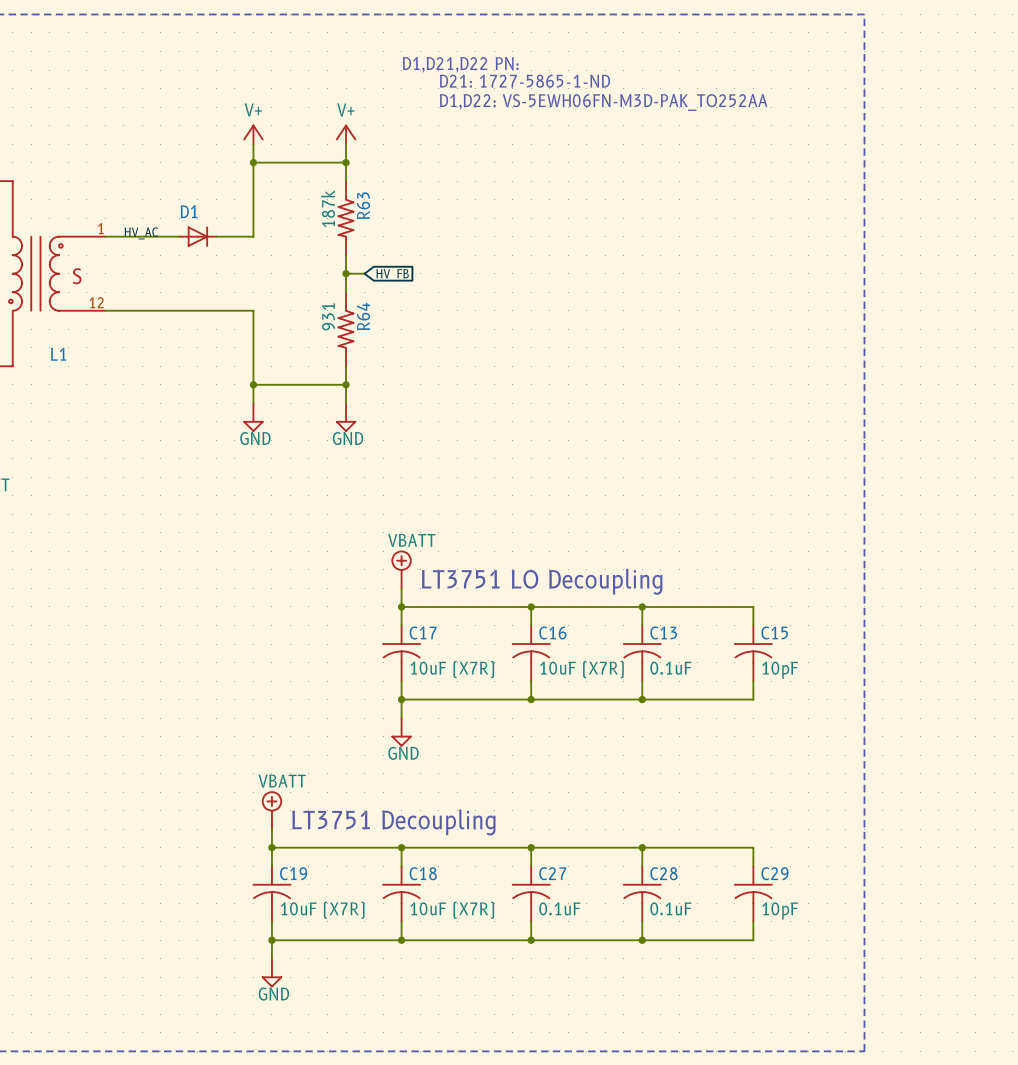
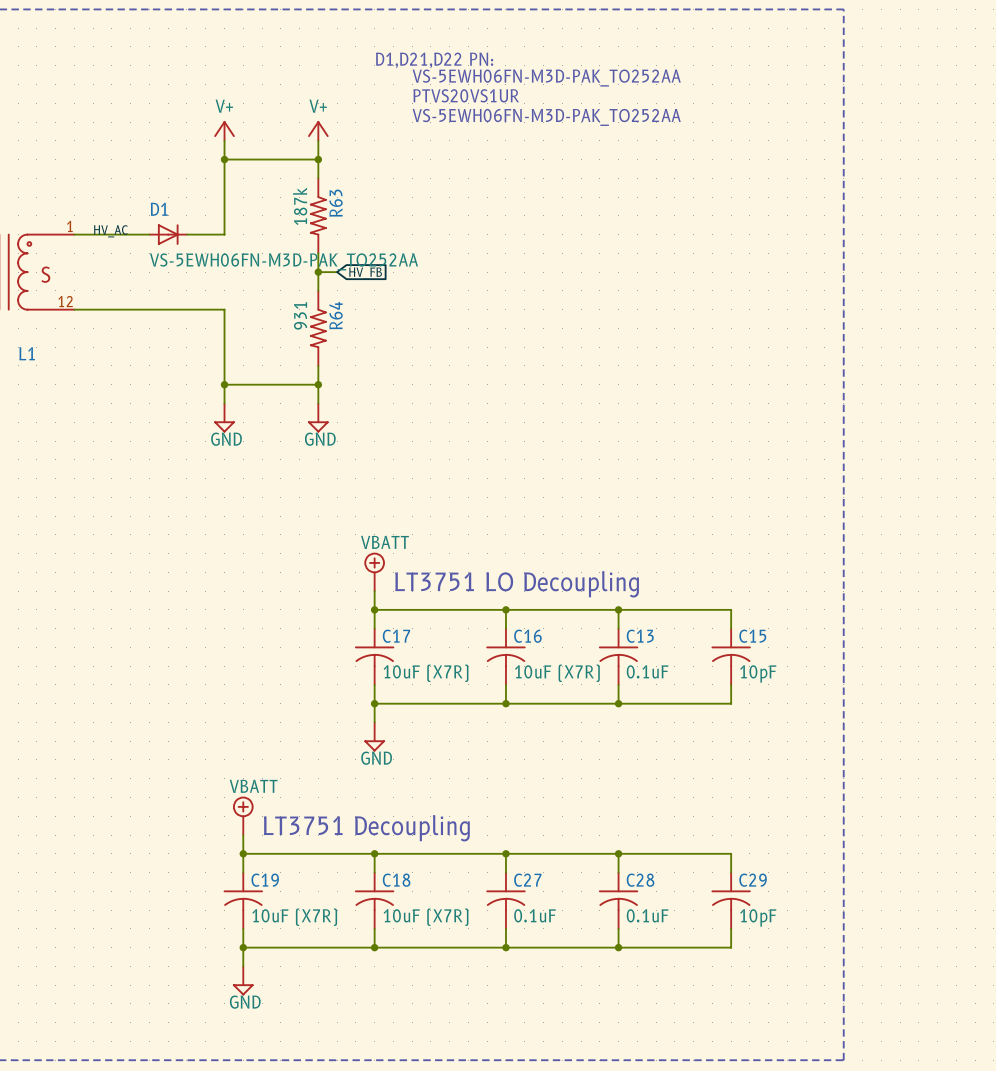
text: D21: 1727-5865-1-ND (524, 81) -> VS-5EWH06FN-M3D-PAK_TO252AA (546, 78)
text: D1,D22: VS-5EWH06FN-M3D-PAK_TO252AA (603, 102) -> PTVS20VS1UR (466, 95)
text: none -> VS-5EWH06FN-M3D-PAK_TO252AA (546, 117)
D1 value: none -> VS-5EWH06FN-M3D-PAK_TO252AA (284, 261)

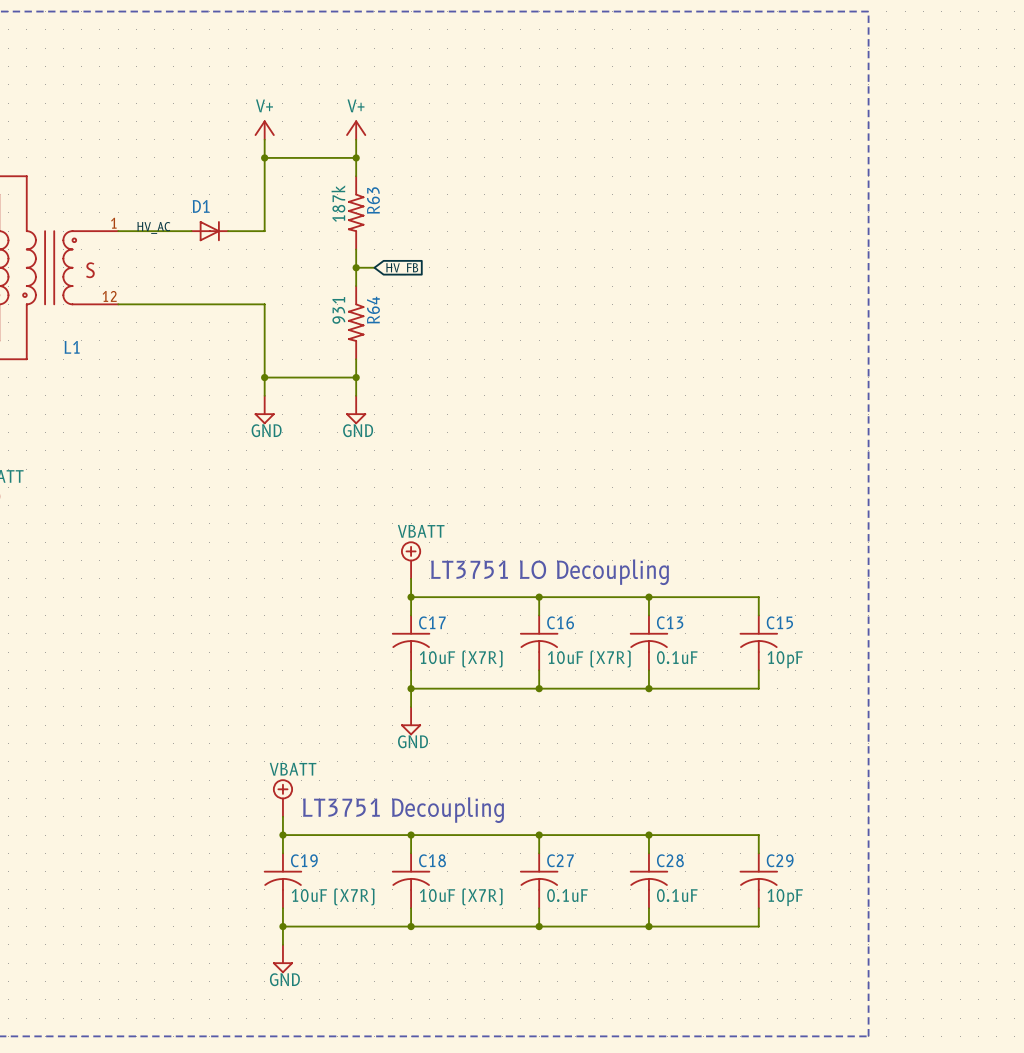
text: D1,D21,D22 PN: (434, 60) -> none
text: VS-5EWH06FN-M3D-PAK_TO252AA (546, 78) -> none
text: PTVS20VS1UR (466, 95) -> none
text: VS-5EWH06FN-M3D-PAK_TO252AA (546, 117) -> none
D1 value: VS-5EWH06FN-M3D-PAK_TO252AA (284, 261) -> none

